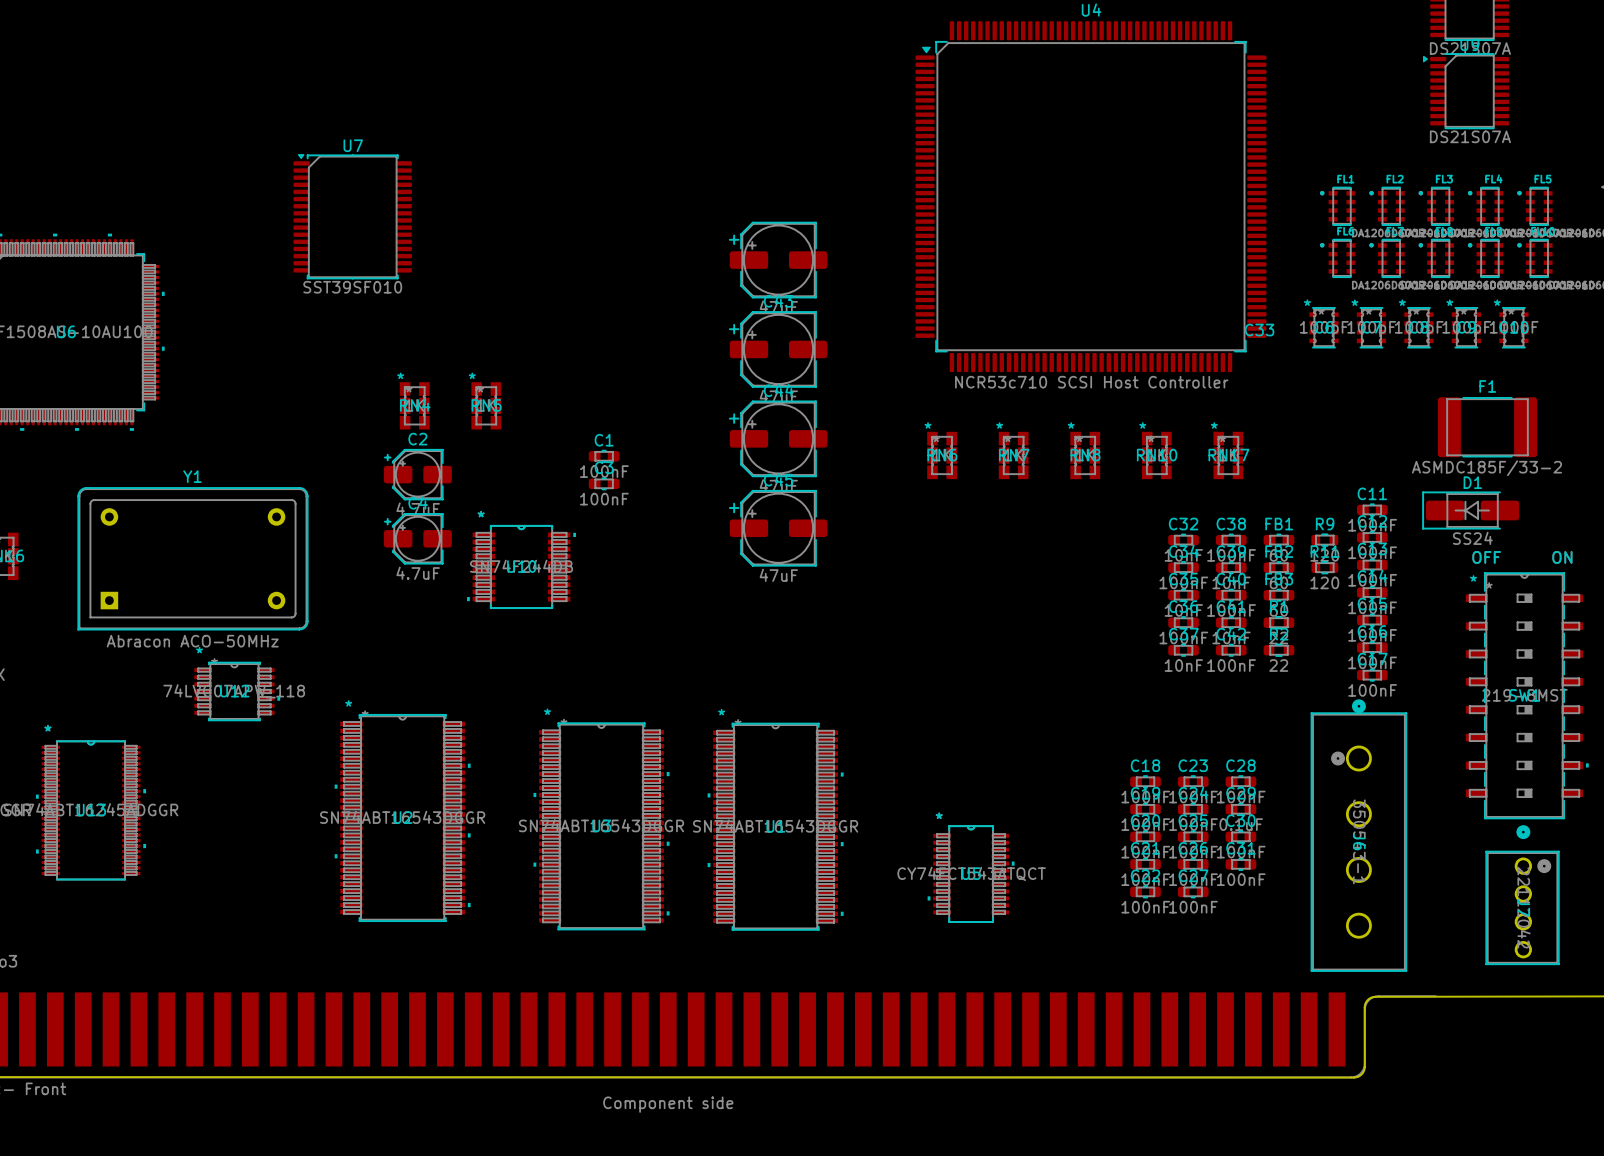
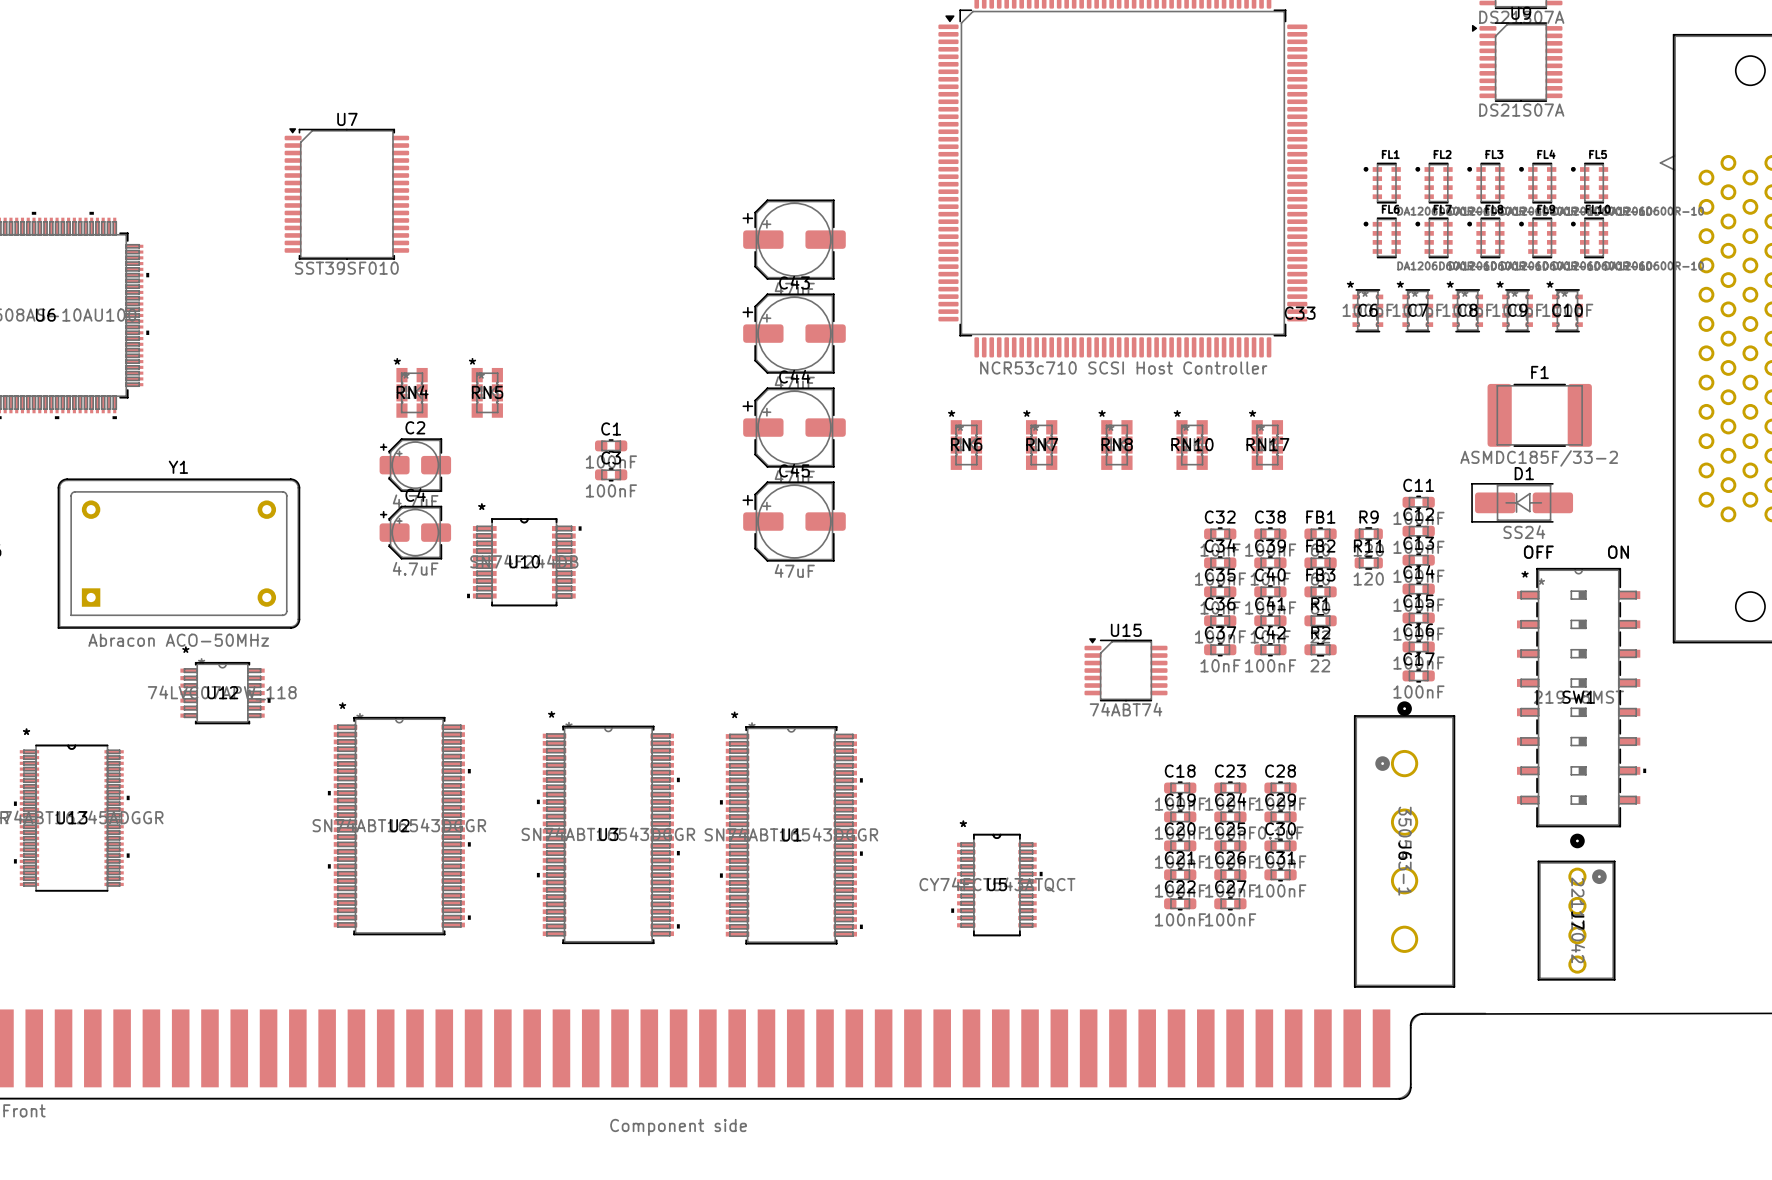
U15: none -> 74ABT74 (1125, 669)

